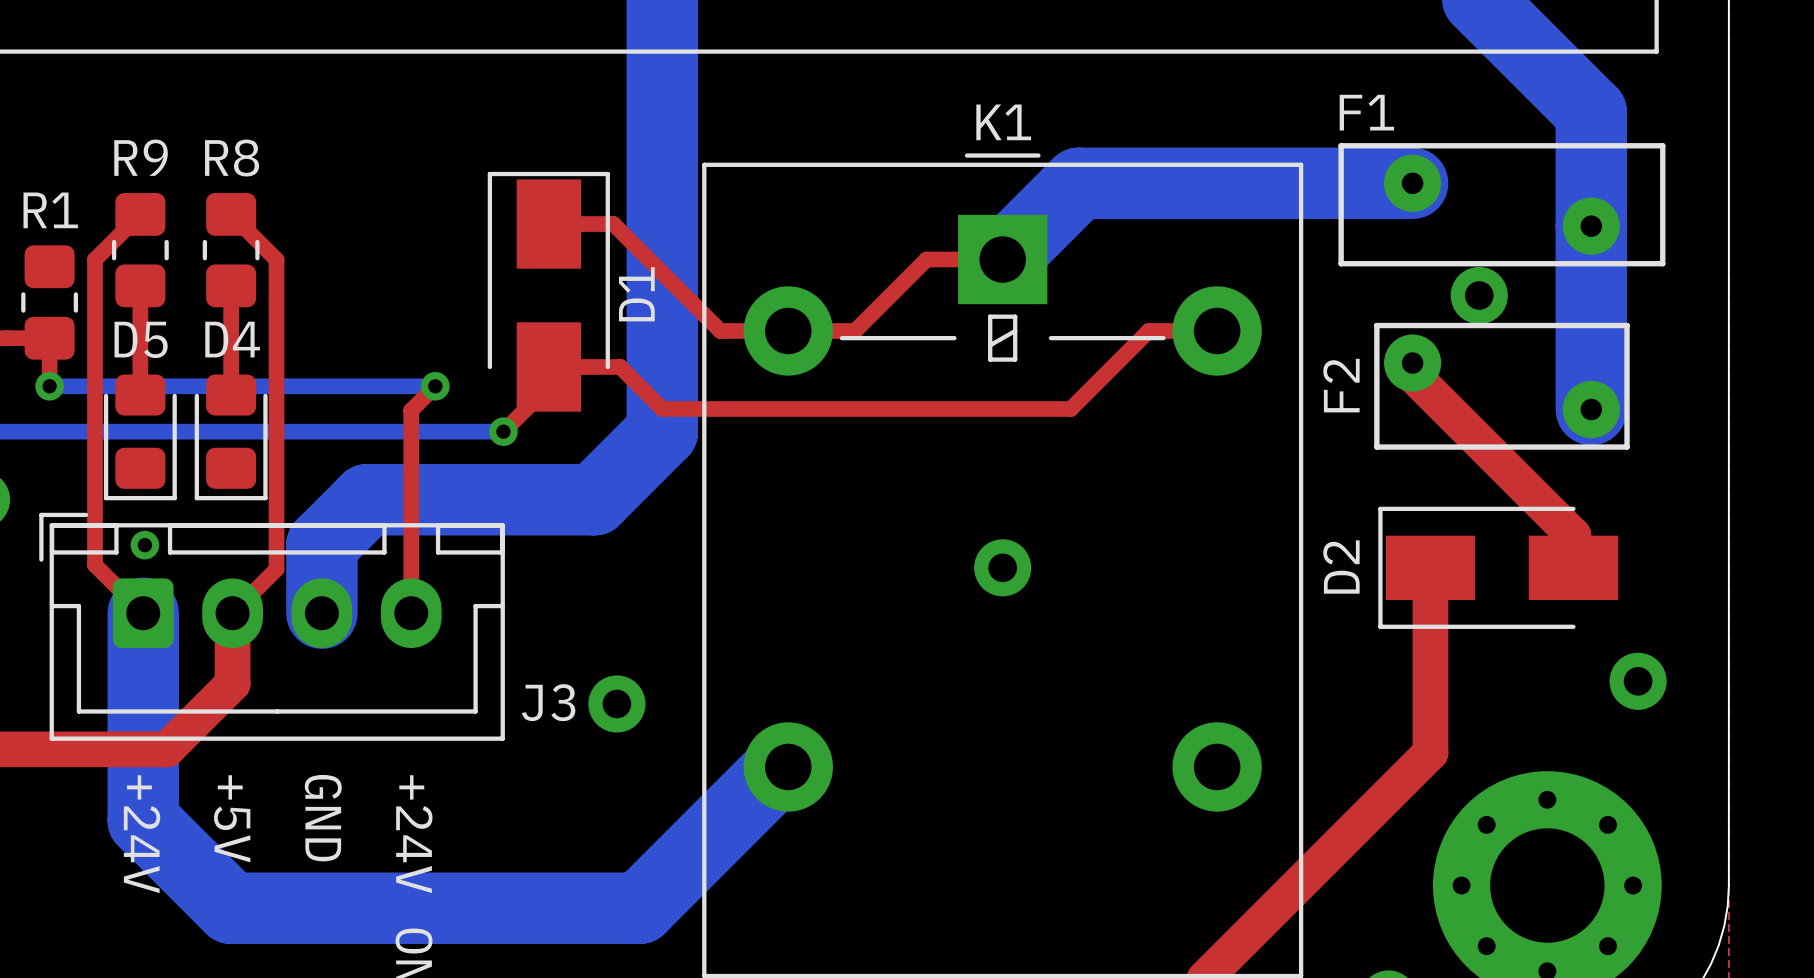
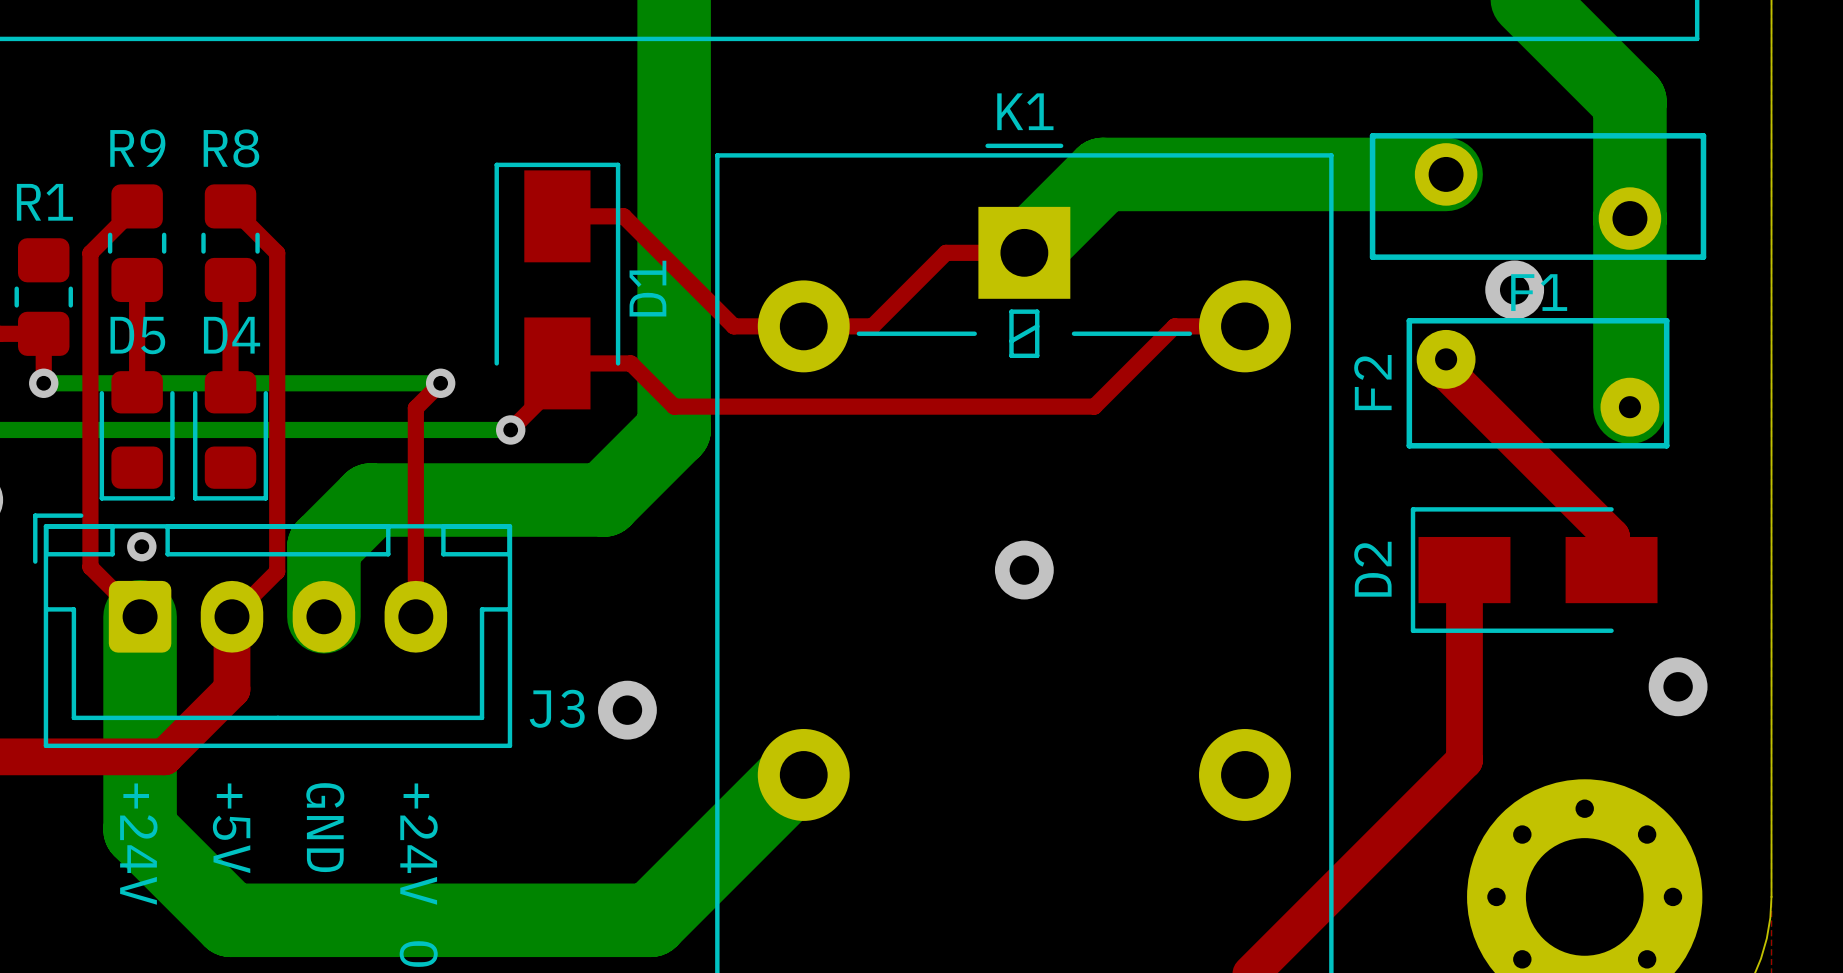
F1 name position: F1 (1366, 112) -> F1 (1539, 292)
F1 footprint: [1338, 143, 1666, 267] -> [1369, 133, 1707, 260]

